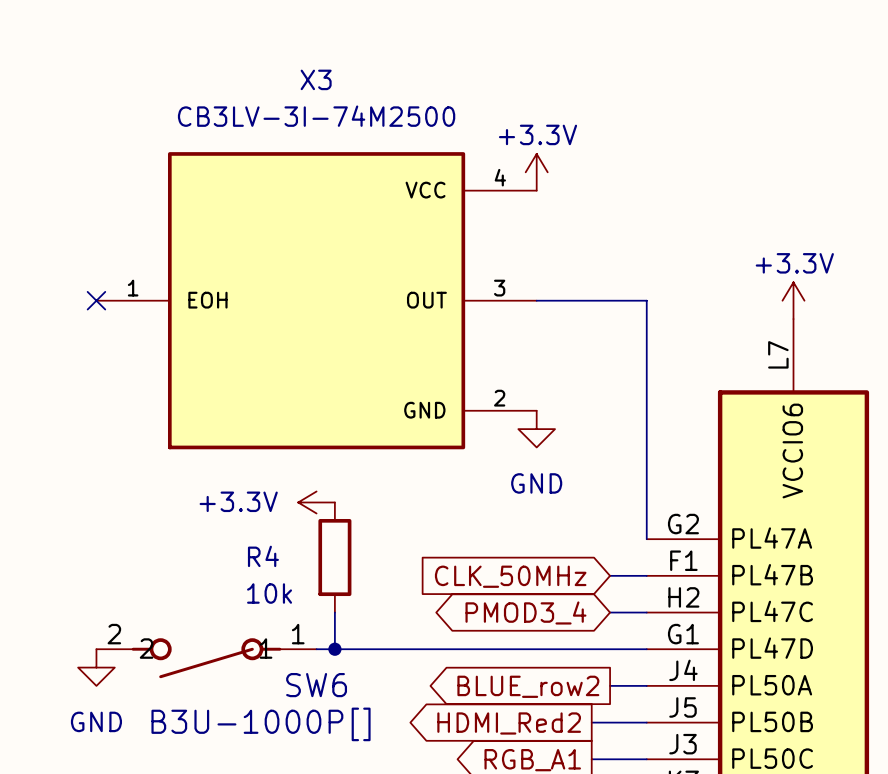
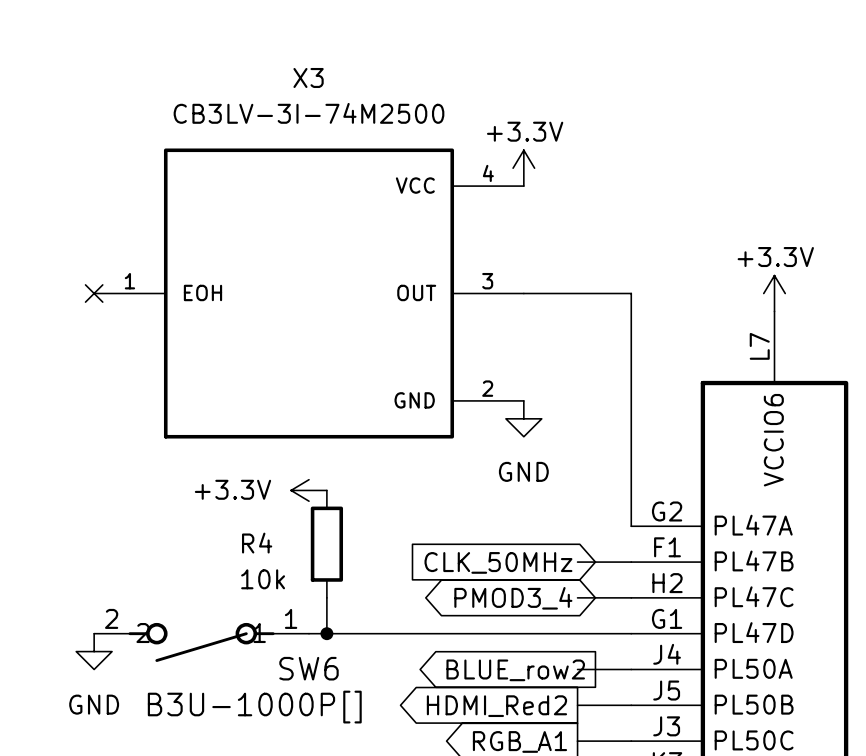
wire: none -> (577, 562) (595, 562)
wire: none -> (577, 597) (595, 597)
wire: none -> (577, 669) (595, 669)

